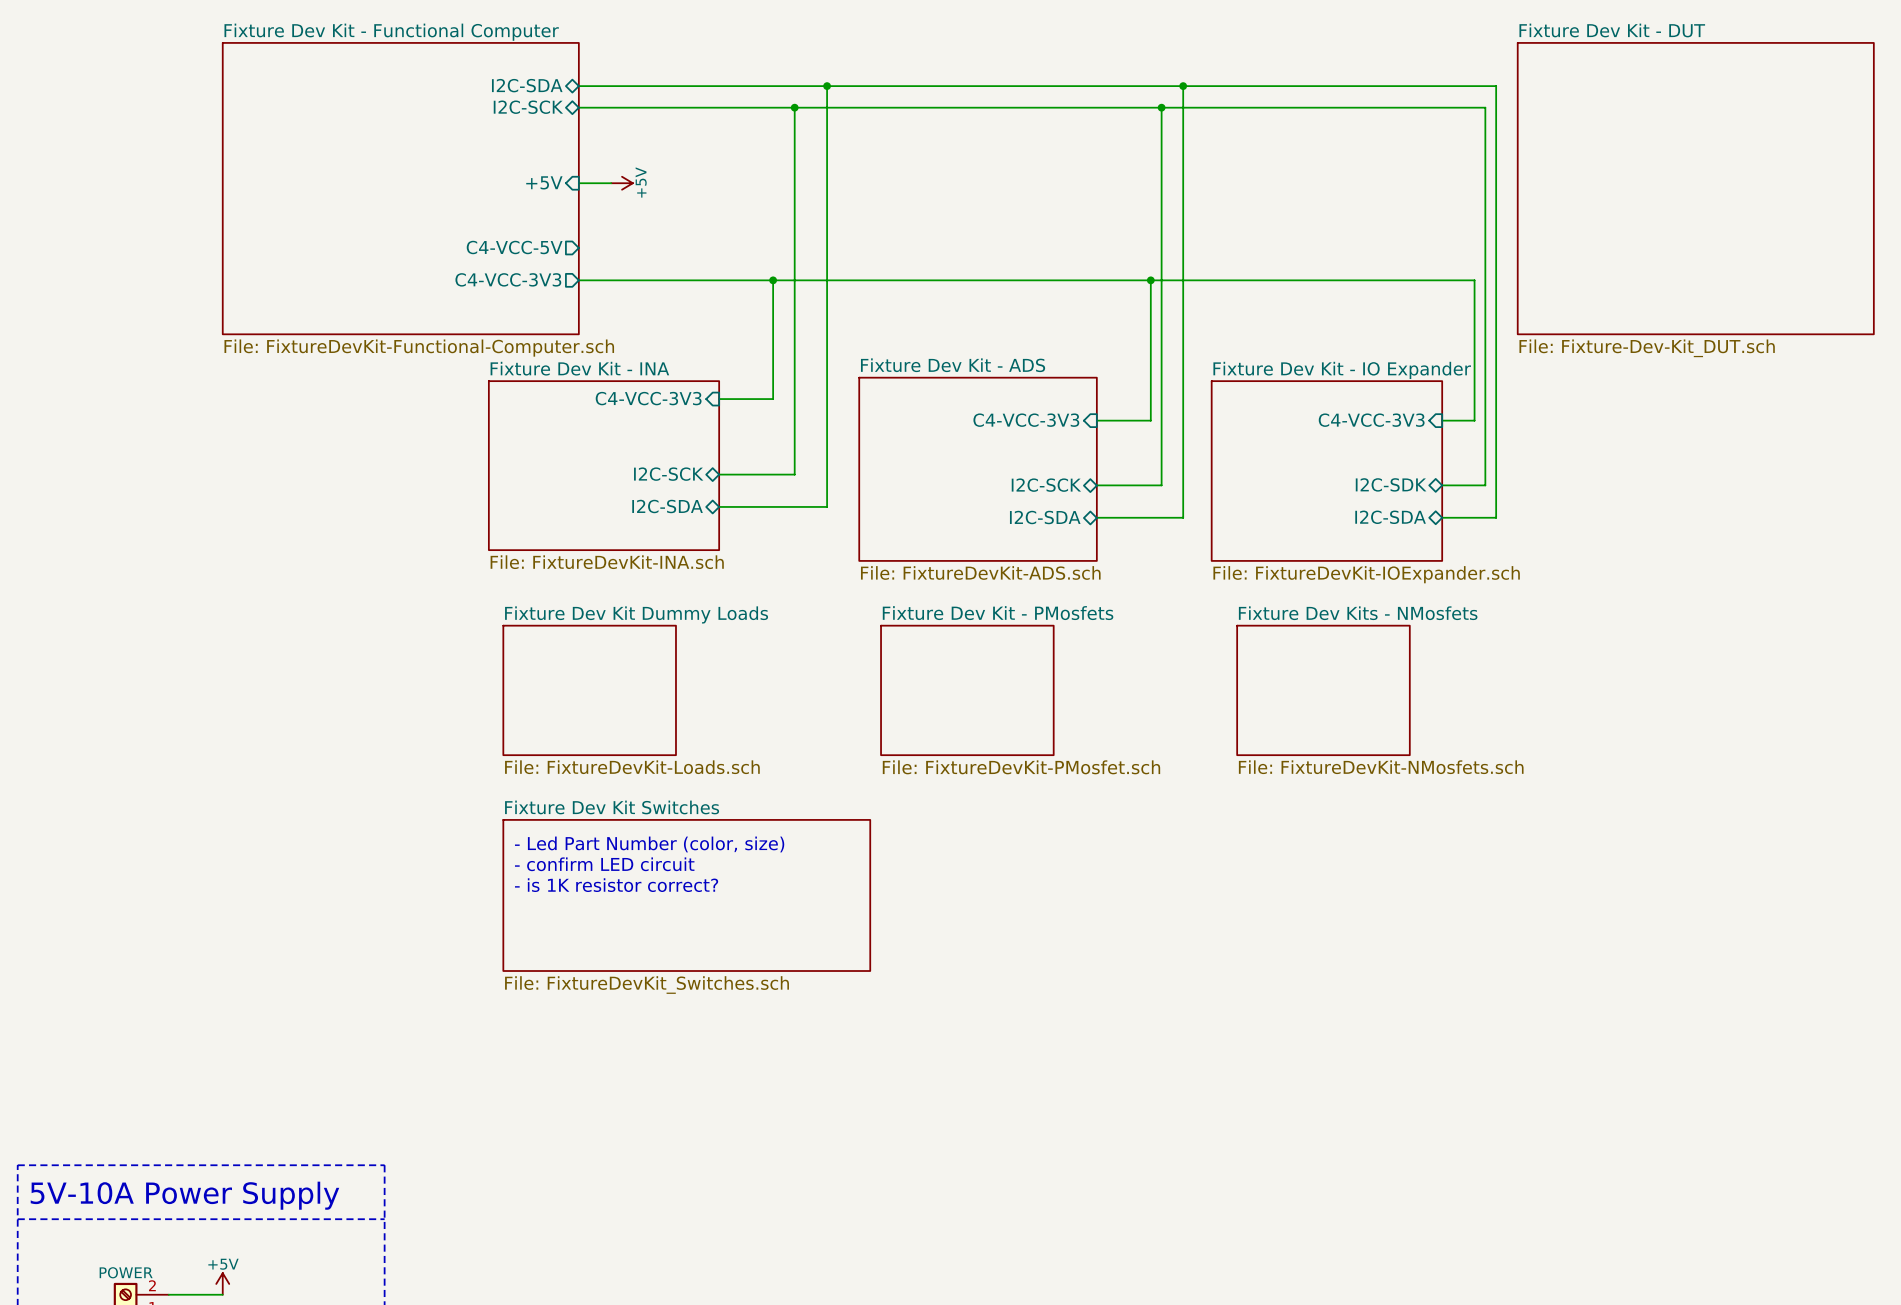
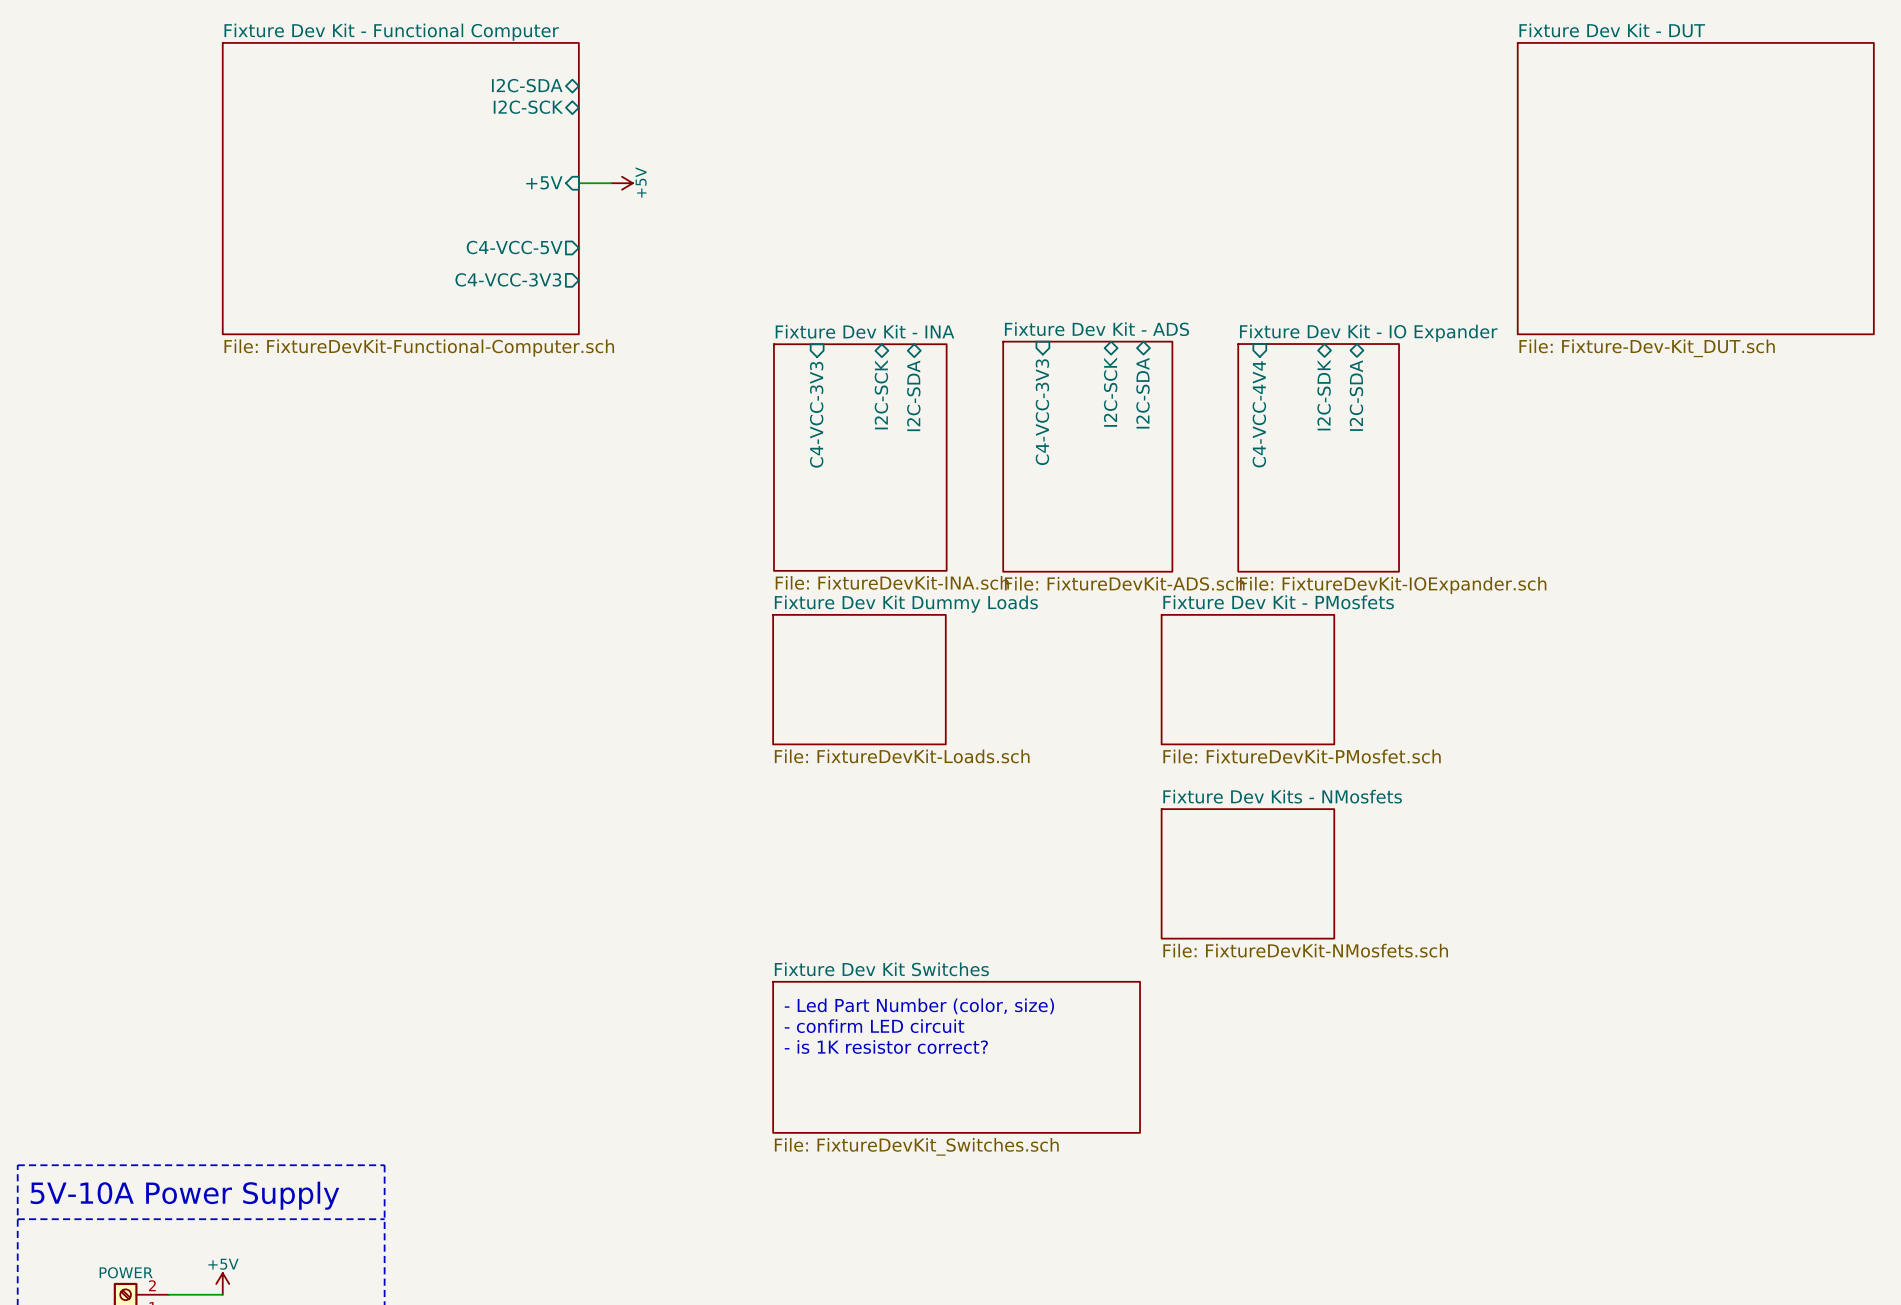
wire: (578, 86) (1496, 86) (1496, 517) (1442, 517) -> none
wire: (827, 86) (827, 506) (719, 506) -> none
junction: (827, 86) -> none
wire: (1183, 86) (1183, 517) (1096, 517) -> none
junction: (1183, 86) -> none
wire: (578, 107) (1485, 107) (1485, 485) (1442, 485) -> none
wire: (794, 107) (794, 474) (719, 474) -> none
junction: (794, 107) -> none
wire: (1161, 107) (1161, 485) (1096, 485) -> none
junction: (1161, 107) -> none
wire: (578, 280) (1474, 280) (1474, 420) (1442, 420) -> none
wire: (773, 280) (773, 399) (719, 399) -> none
junction: (773, 280) -> none
wire: (1150, 280) (1150, 420) (1096, 420) -> none
junction: (1150, 280) -> none
sheet pin: none -> I2C-SCK (1110, 392)
sheet pin: none -> I2C-SDA (1143, 393)
sheet pin: none -> I2C-SCK (881, 394)
sheet pin: none -> I2C-SDA (913, 395)
sheet pin: none -> I2C-SDA (1356, 395)
sheet pin rotation: 0° (648, 398) -> 90° counterclockwise (816, 414)
sheet pin position: C4-VCC-3V3 (648, 398) -> C4-VCC-3V3 (816, 414)
sheet pin: none -> C4-VCC-4V4 (1259, 414)
sheet pin rotation: 0° (1026, 420) -> 90° counterclockwise (1042, 412)
sheet pin: C4-VCC-3V3 (1371, 420) -> none
sheet Fixture Dev Kit - ADS: none -> File: FixtureDevKit-ADS.sch (1087, 456)
sheet Fixture Dev Kit - INA: none -> File: FixtureDevKit-INA.sch (860, 457)
sheet Fixture Dev Kit - IO Expander: none -> File: FixtureDevKit-IOExpander.sch (1318, 457)
sheet Fixture Dev Kit - INA: File: FixtureDevKit-INA.sch (604, 465) -> none
sheet Fixture Dev Kit - ADS: File: FixtureDevKit-ADS.sch (978, 469) -> none
sheet Fixture Dev Kit - IO Expander: File: FixtureDevKit-IOExpander.sch (1326, 471) -> none
sheet pin: I2C-SCK (668, 474) -> none
sheet pin rotation: 0° (1391, 484) -> 90° counterclockwise (1324, 395)
sheet pin: I2C-SCK (1046, 485) -> none
sheet pin: I2C-SDA (667, 506) -> none
sheet pin: I2C-SDA (1045, 517) -> none
sheet pin: I2C-SDA (1390, 517) -> none
sheet Fixture Dev Kit Dummy Loads: none -> File: FixtureDevKit-Loads.sch (859, 679)
sheet Fixture Dev Kit - PMosfets: none -> File: FixtureDevKit-PMosfet.sch (1247, 679)
sheet Fixture Dev Kit Dummy Loads: File: FixtureDevKit-Loads.sch (589, 690) -> none
sheet Fixture Dev Kit - PMosfets: File: FixtureDevKit-PMosfet.sch (967, 690) -> none
sheet Fixture Dev Kits - NMosfets position: (1323, 690) -> (1247, 873)
text: - Led Part Number (color, size) (649, 844) -> none
text: - confirm LED circuit (604, 864) -> none
text: - is 1K resistor correct? (616, 885) -> none
sheet Fixture Dev Kit Switches: File: FixtureDevKit_Switches.sch (686, 895) -> none
text: none -> - Led Part Number (color, size) (919, 1006)
text: none -> - confirm LED circuit (874, 1026)
text: none -> - is 1K resistor correct? (886, 1047)
sheet Fixture Dev Kit Switches: none -> File: FixtureDevKit_Switches.sch (956, 1057)

